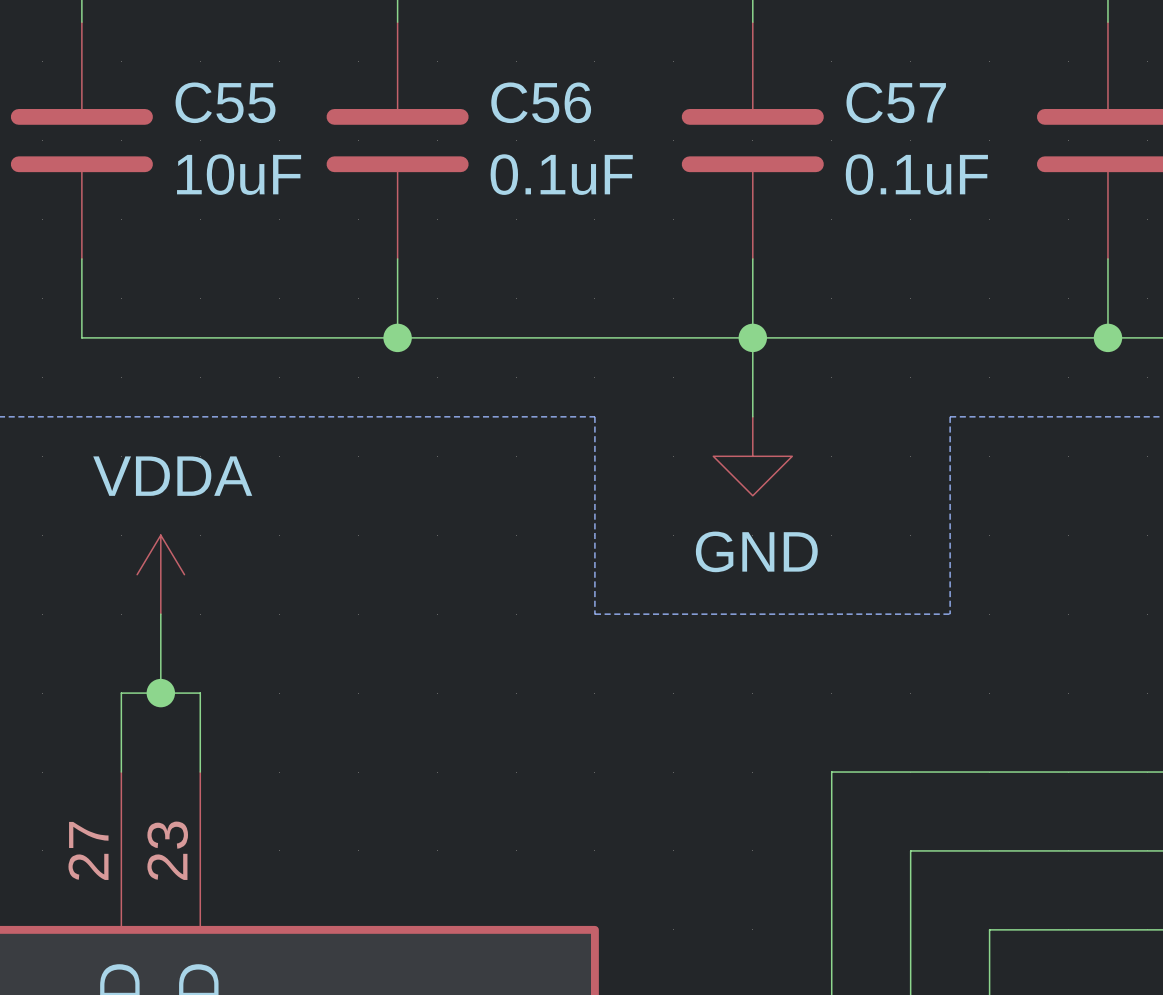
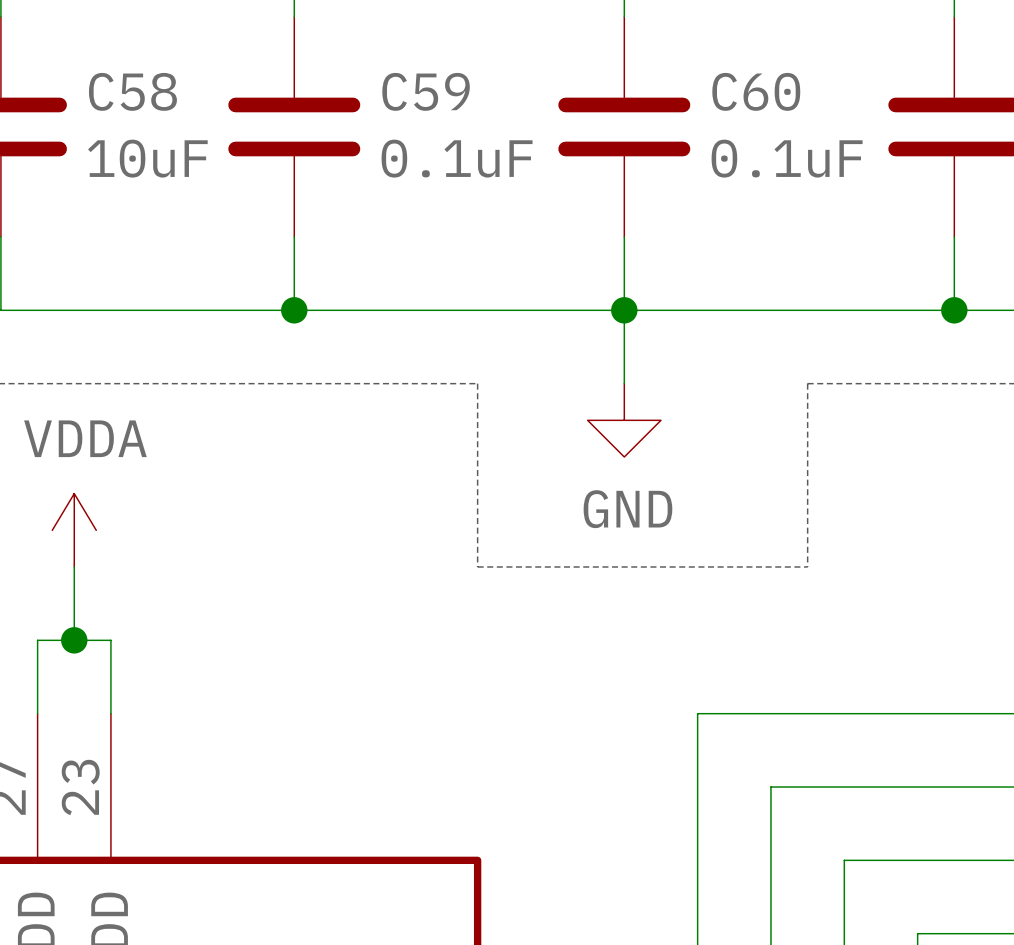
C55 name: C55 (225, 102) -> C58 (132, 91)
C56 name: C56 (541, 102) -> C59 (426, 91)
C57 name: C57 (896, 102) -> C60 (756, 91)

